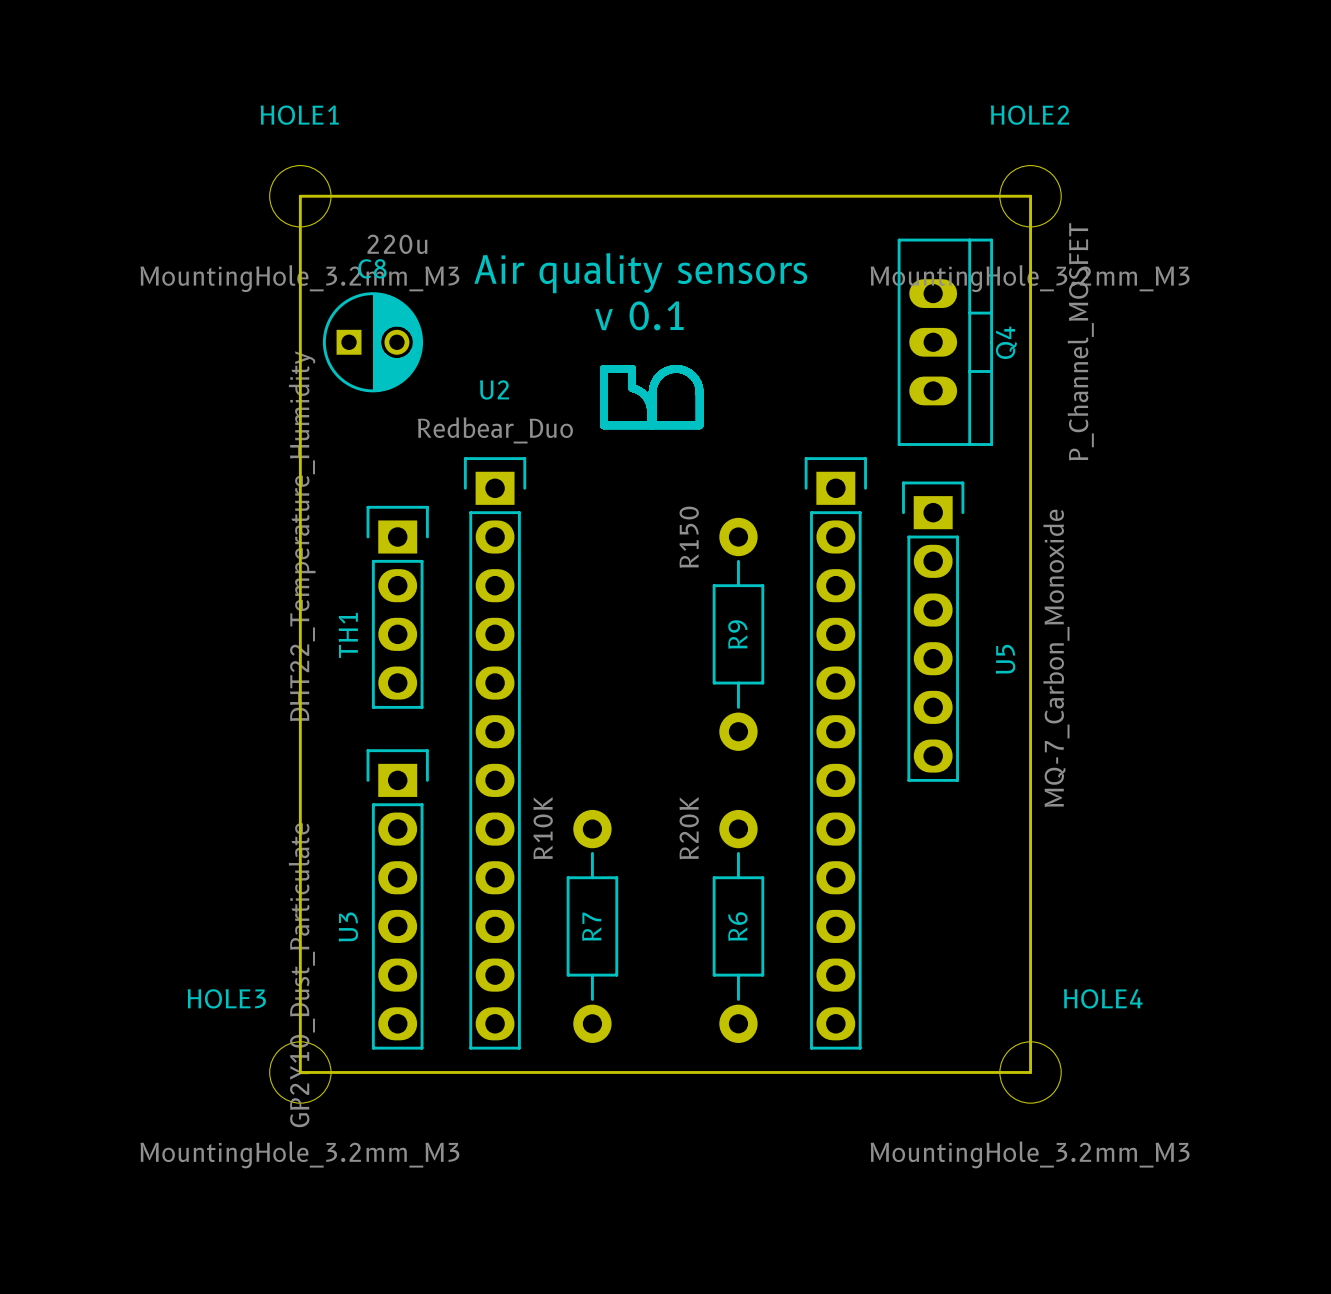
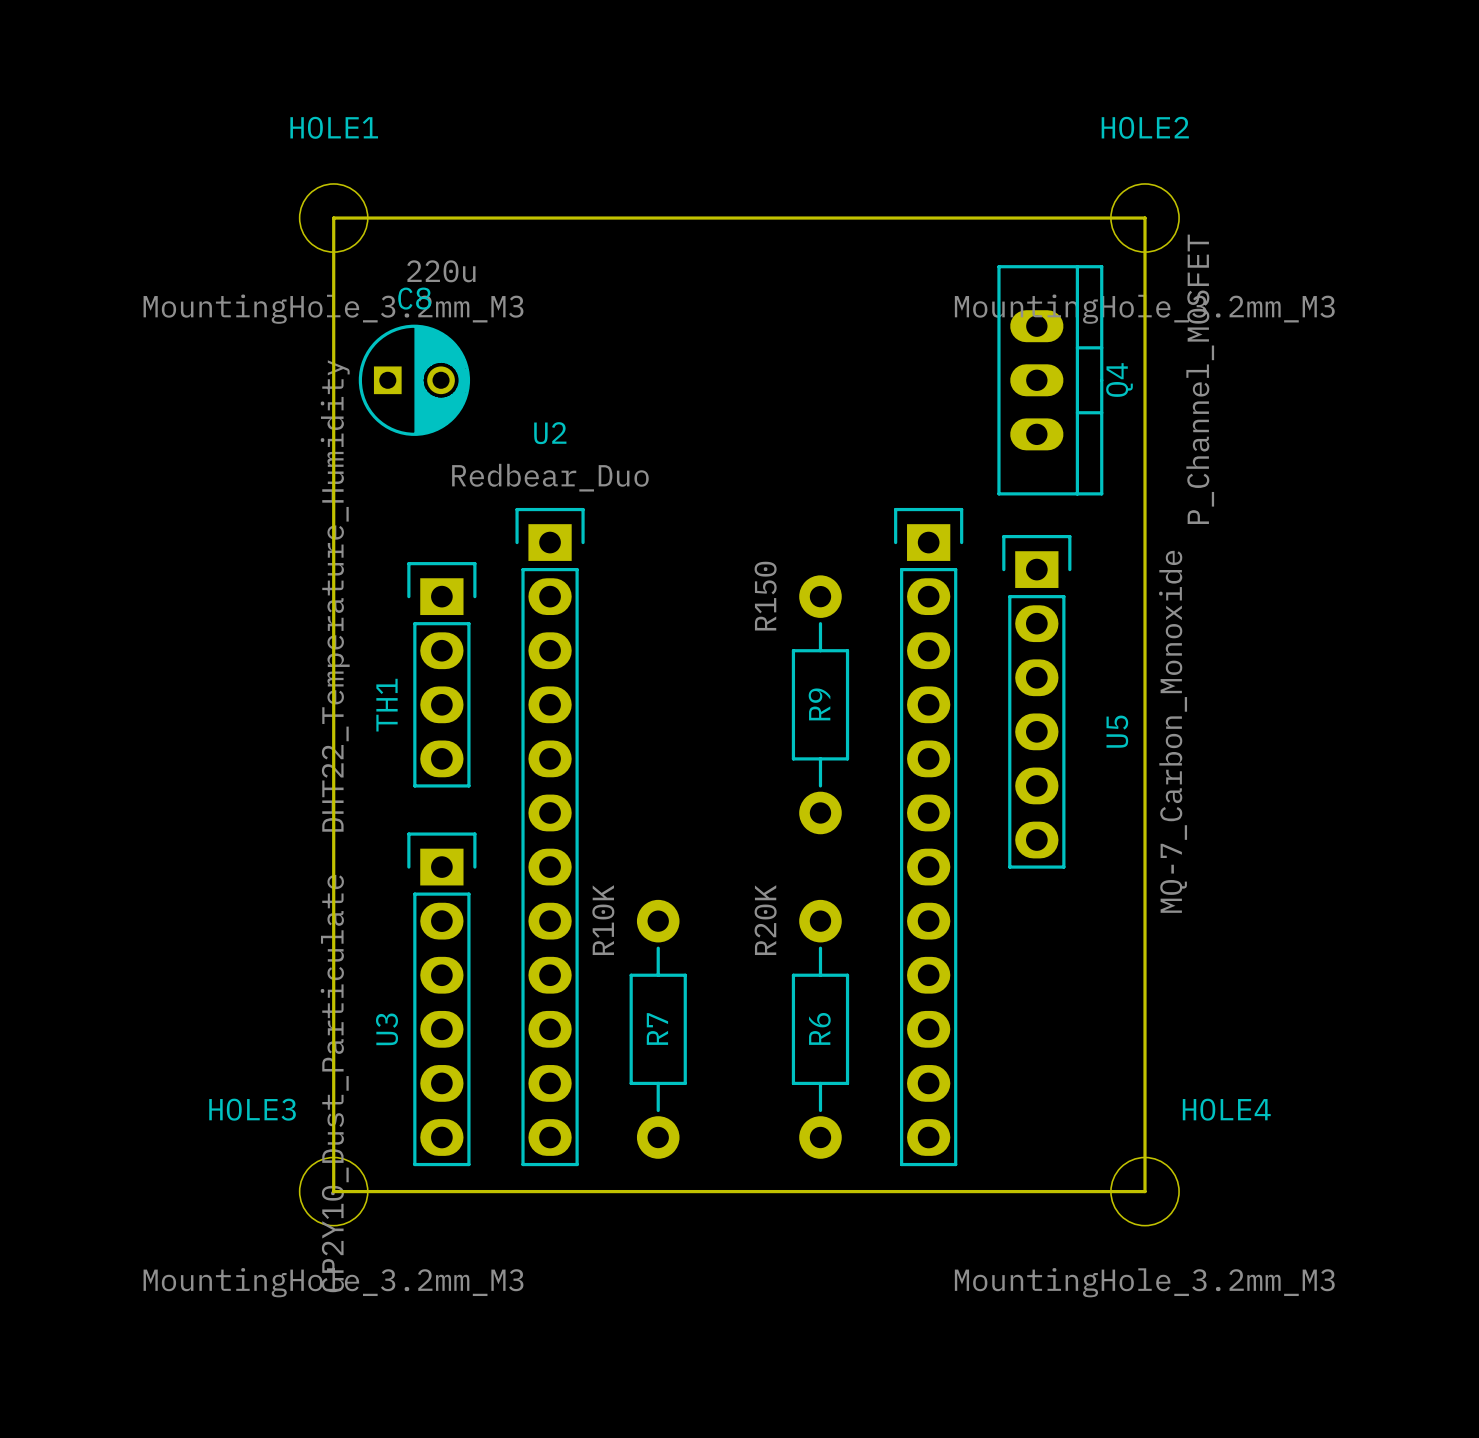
text: Air quality sensors (640, 273) -> none
text: v 0.1 (639, 315) -> none
line: (603, 368) (632, 368) (632, 388) (640, 391) (648, 400) (650, 407) (650, 425) (603, 425) (603, 368) -> none
line: (676, 368) (689, 372) (697, 383) (699, 425) (652, 425) (654, 383) (662, 372) (676, 368) -> none

